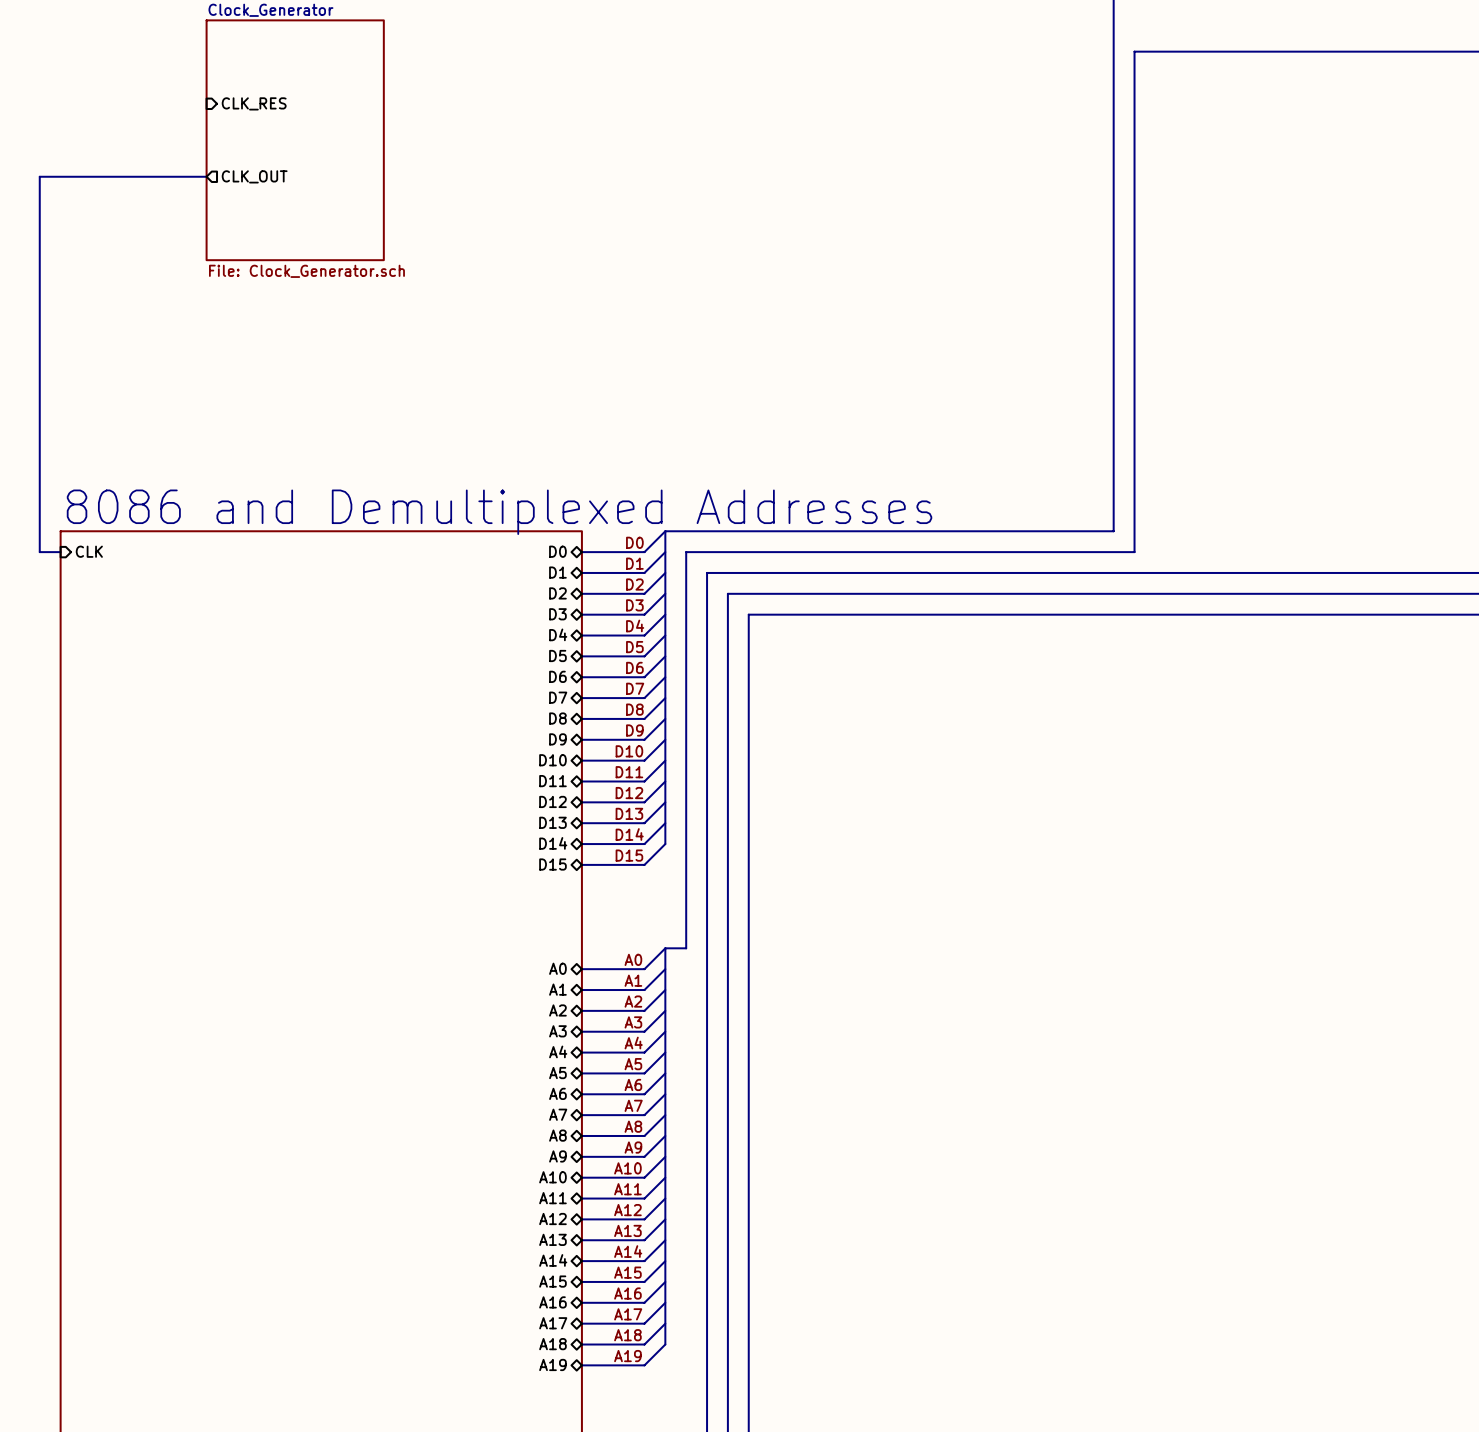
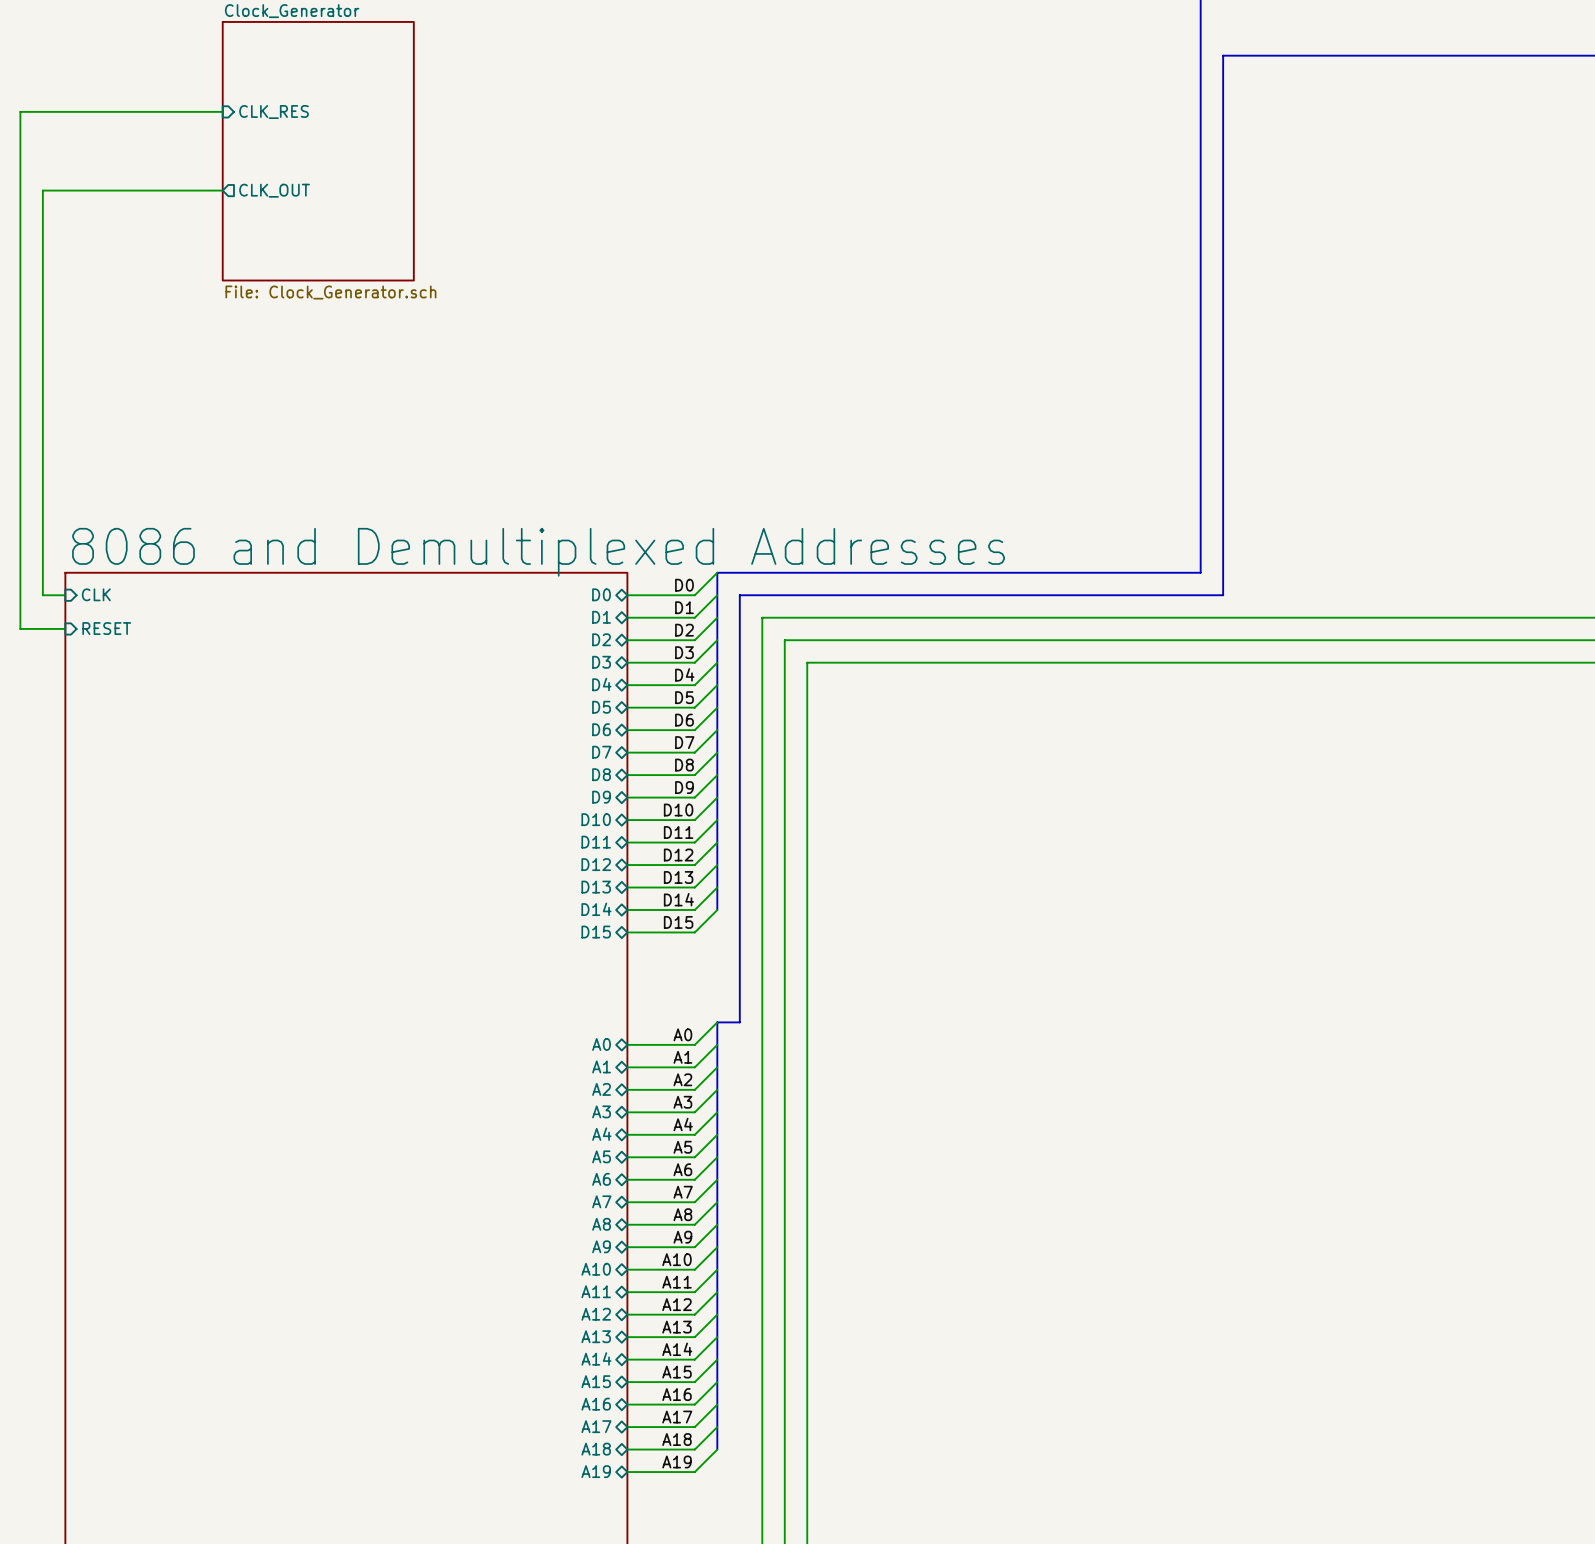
wire: none -> (222, 111) (20, 111) (20, 628) (65, 628)
sheet pin: none -> RESET (106, 628)

